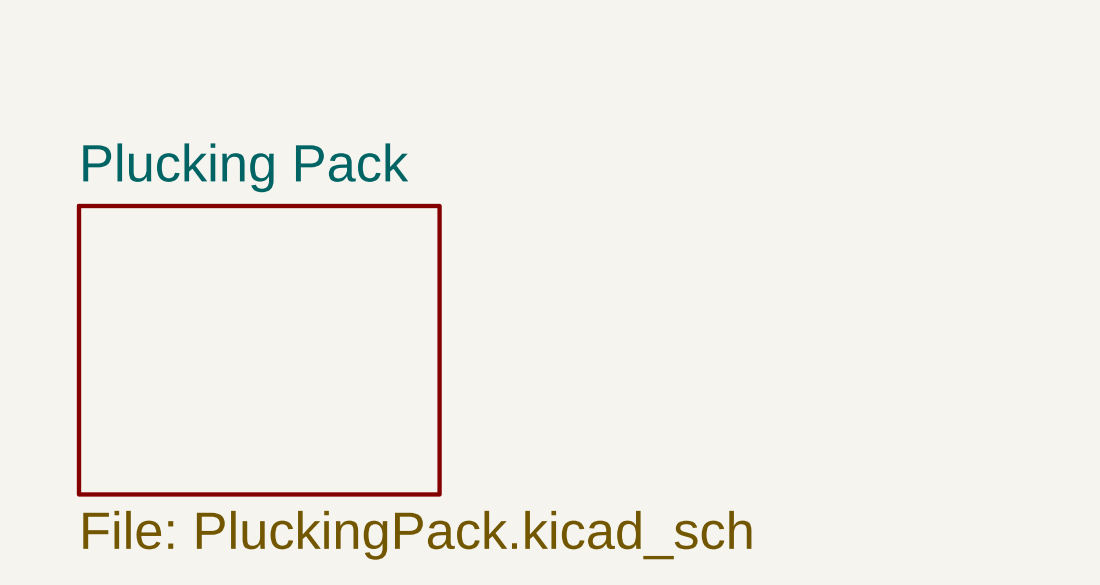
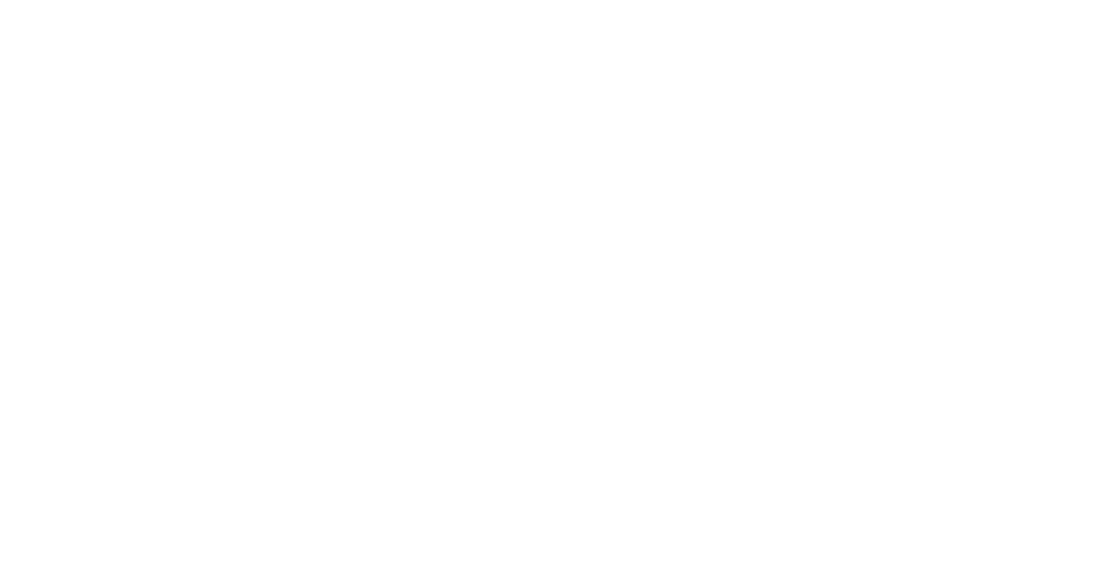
sheet Plucking Pack: File: PluckingPack.kicad_sch (259, 350) -> none

